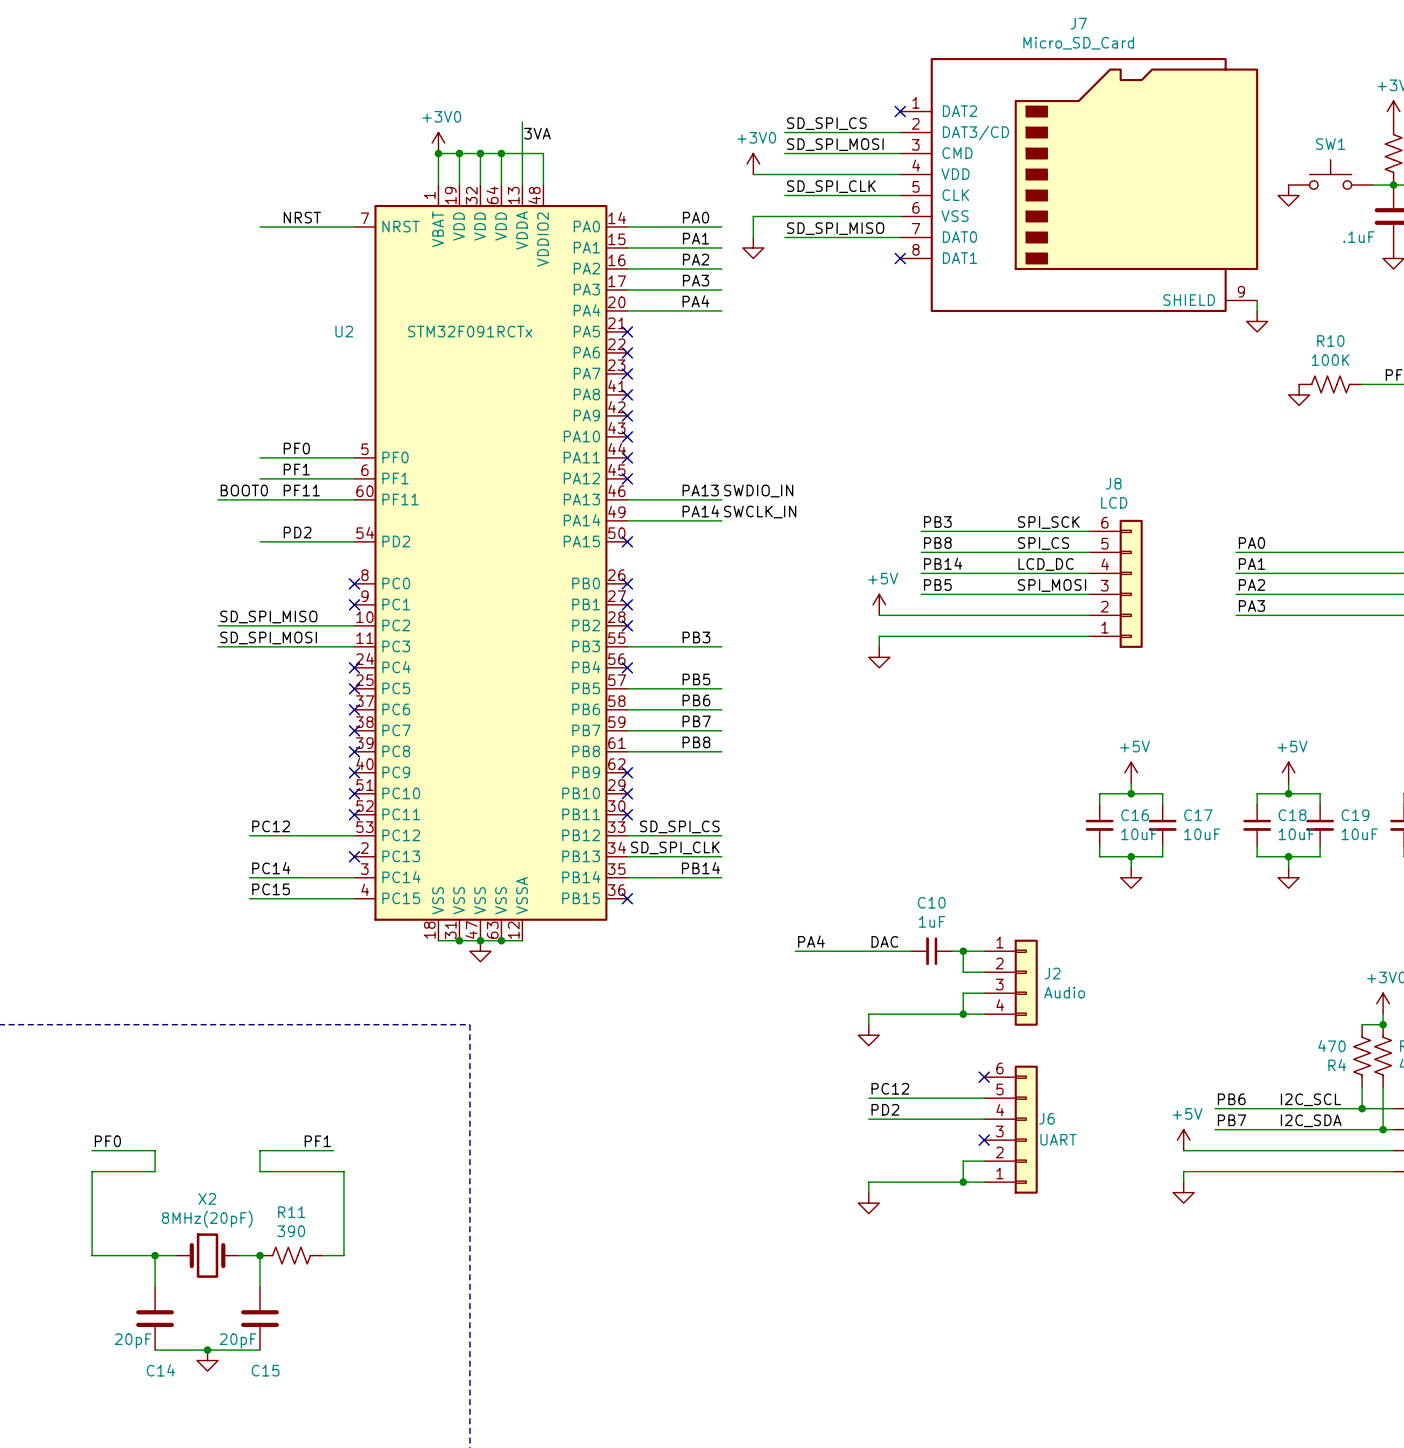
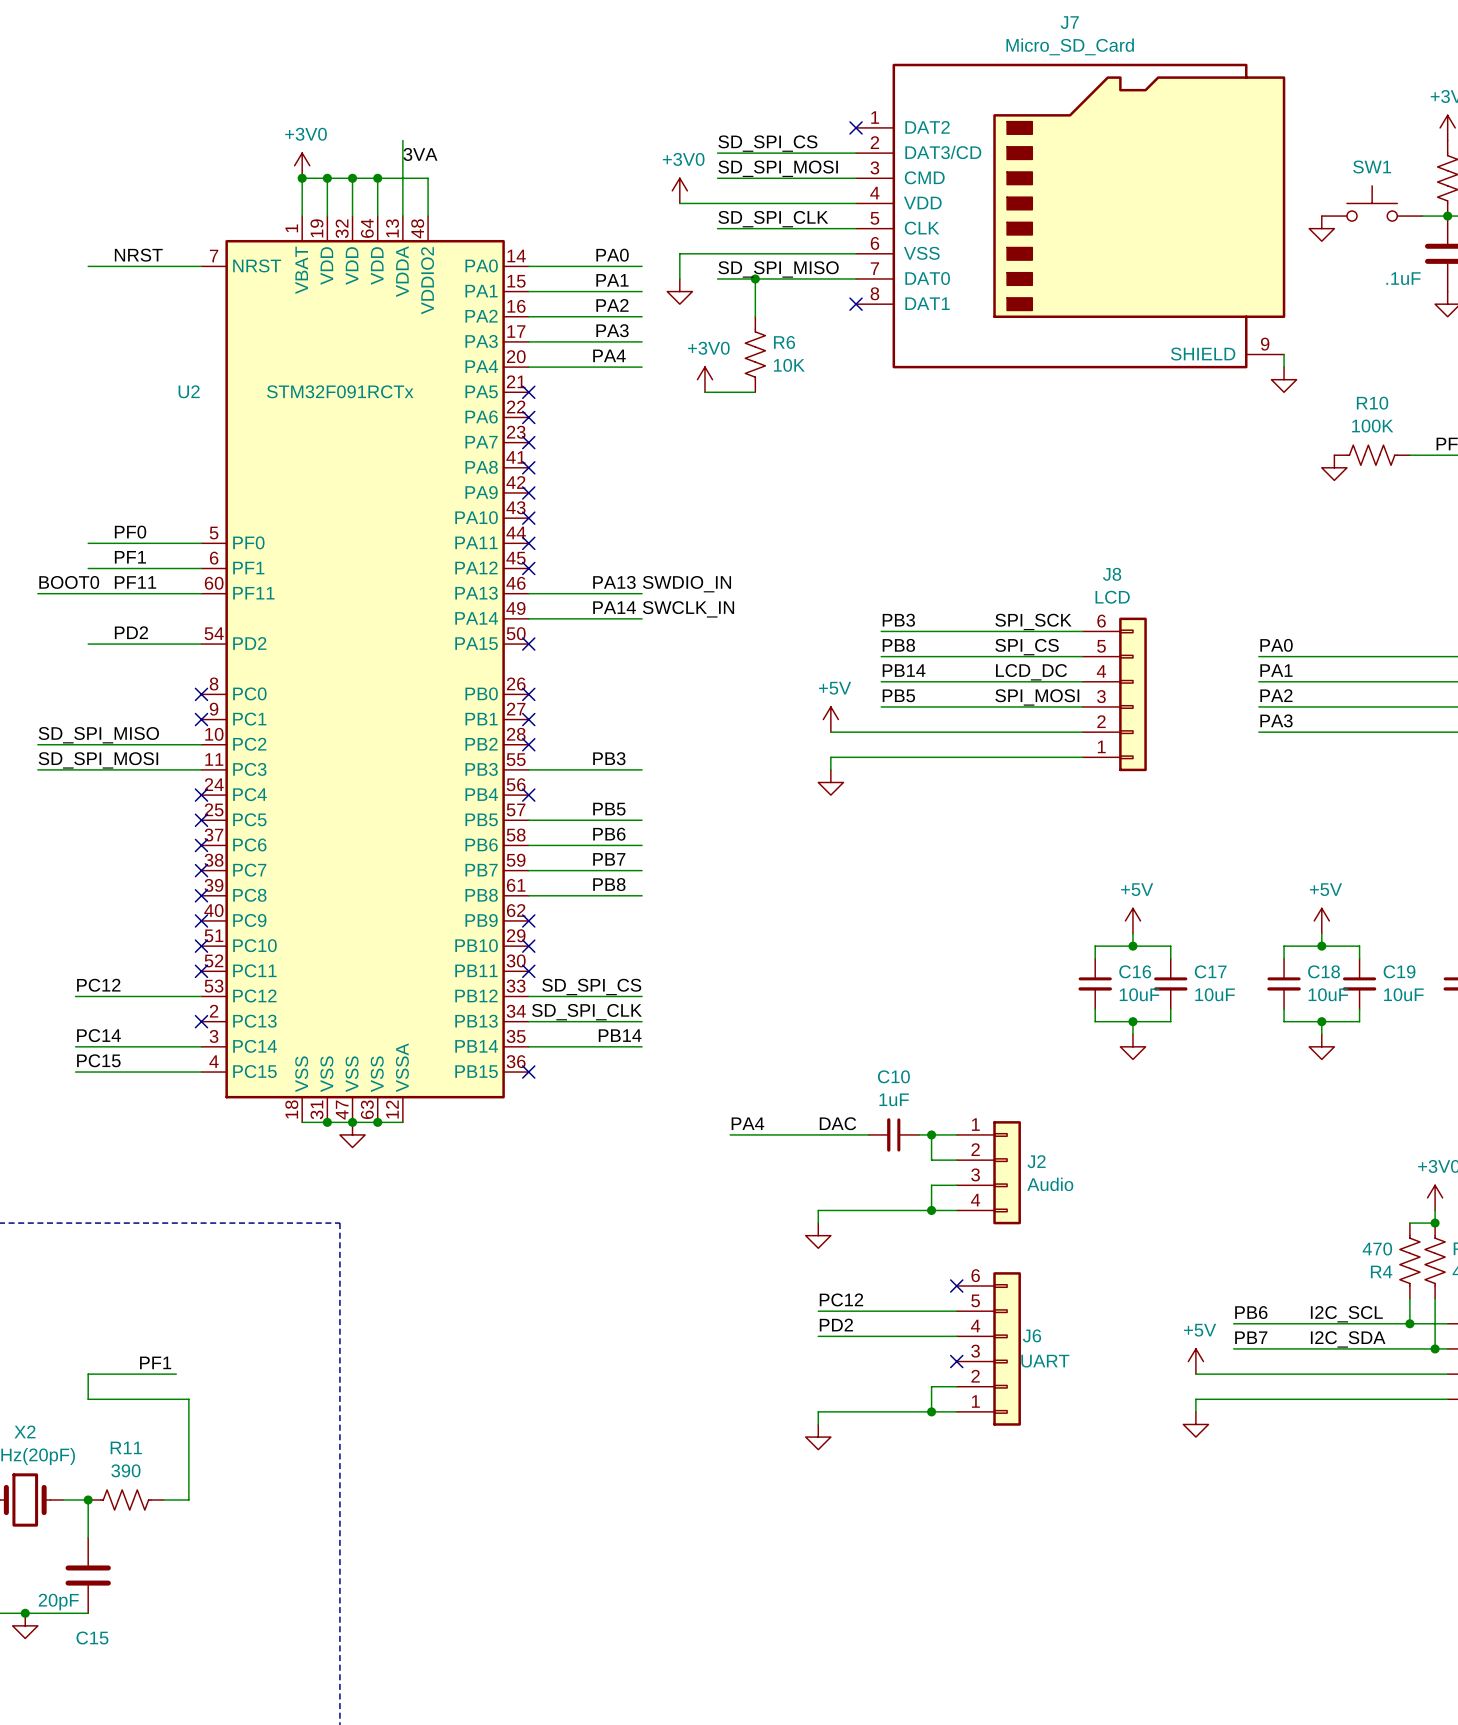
wire: none -> (755, 278) (755, 316)
junction: none -> (755, 278)
R6: none -> 10K (755, 354)
power symbol: none -> +3V0 (704, 379)
wire: none -> (704, 392) (755, 392)

